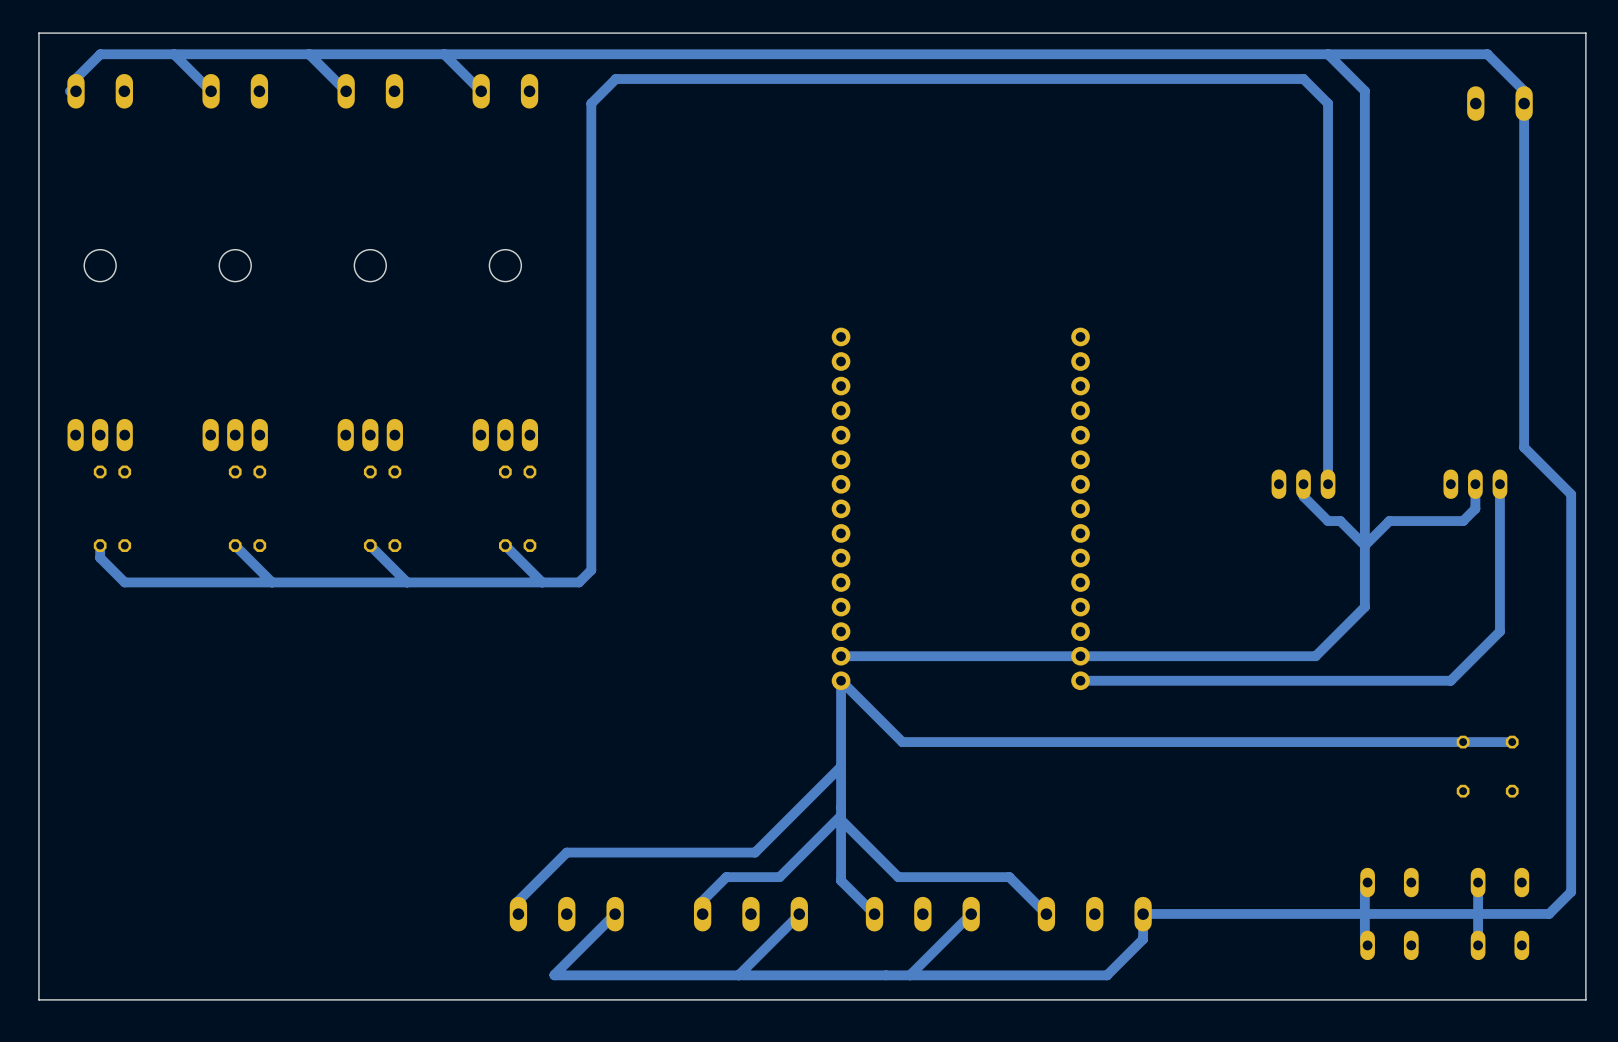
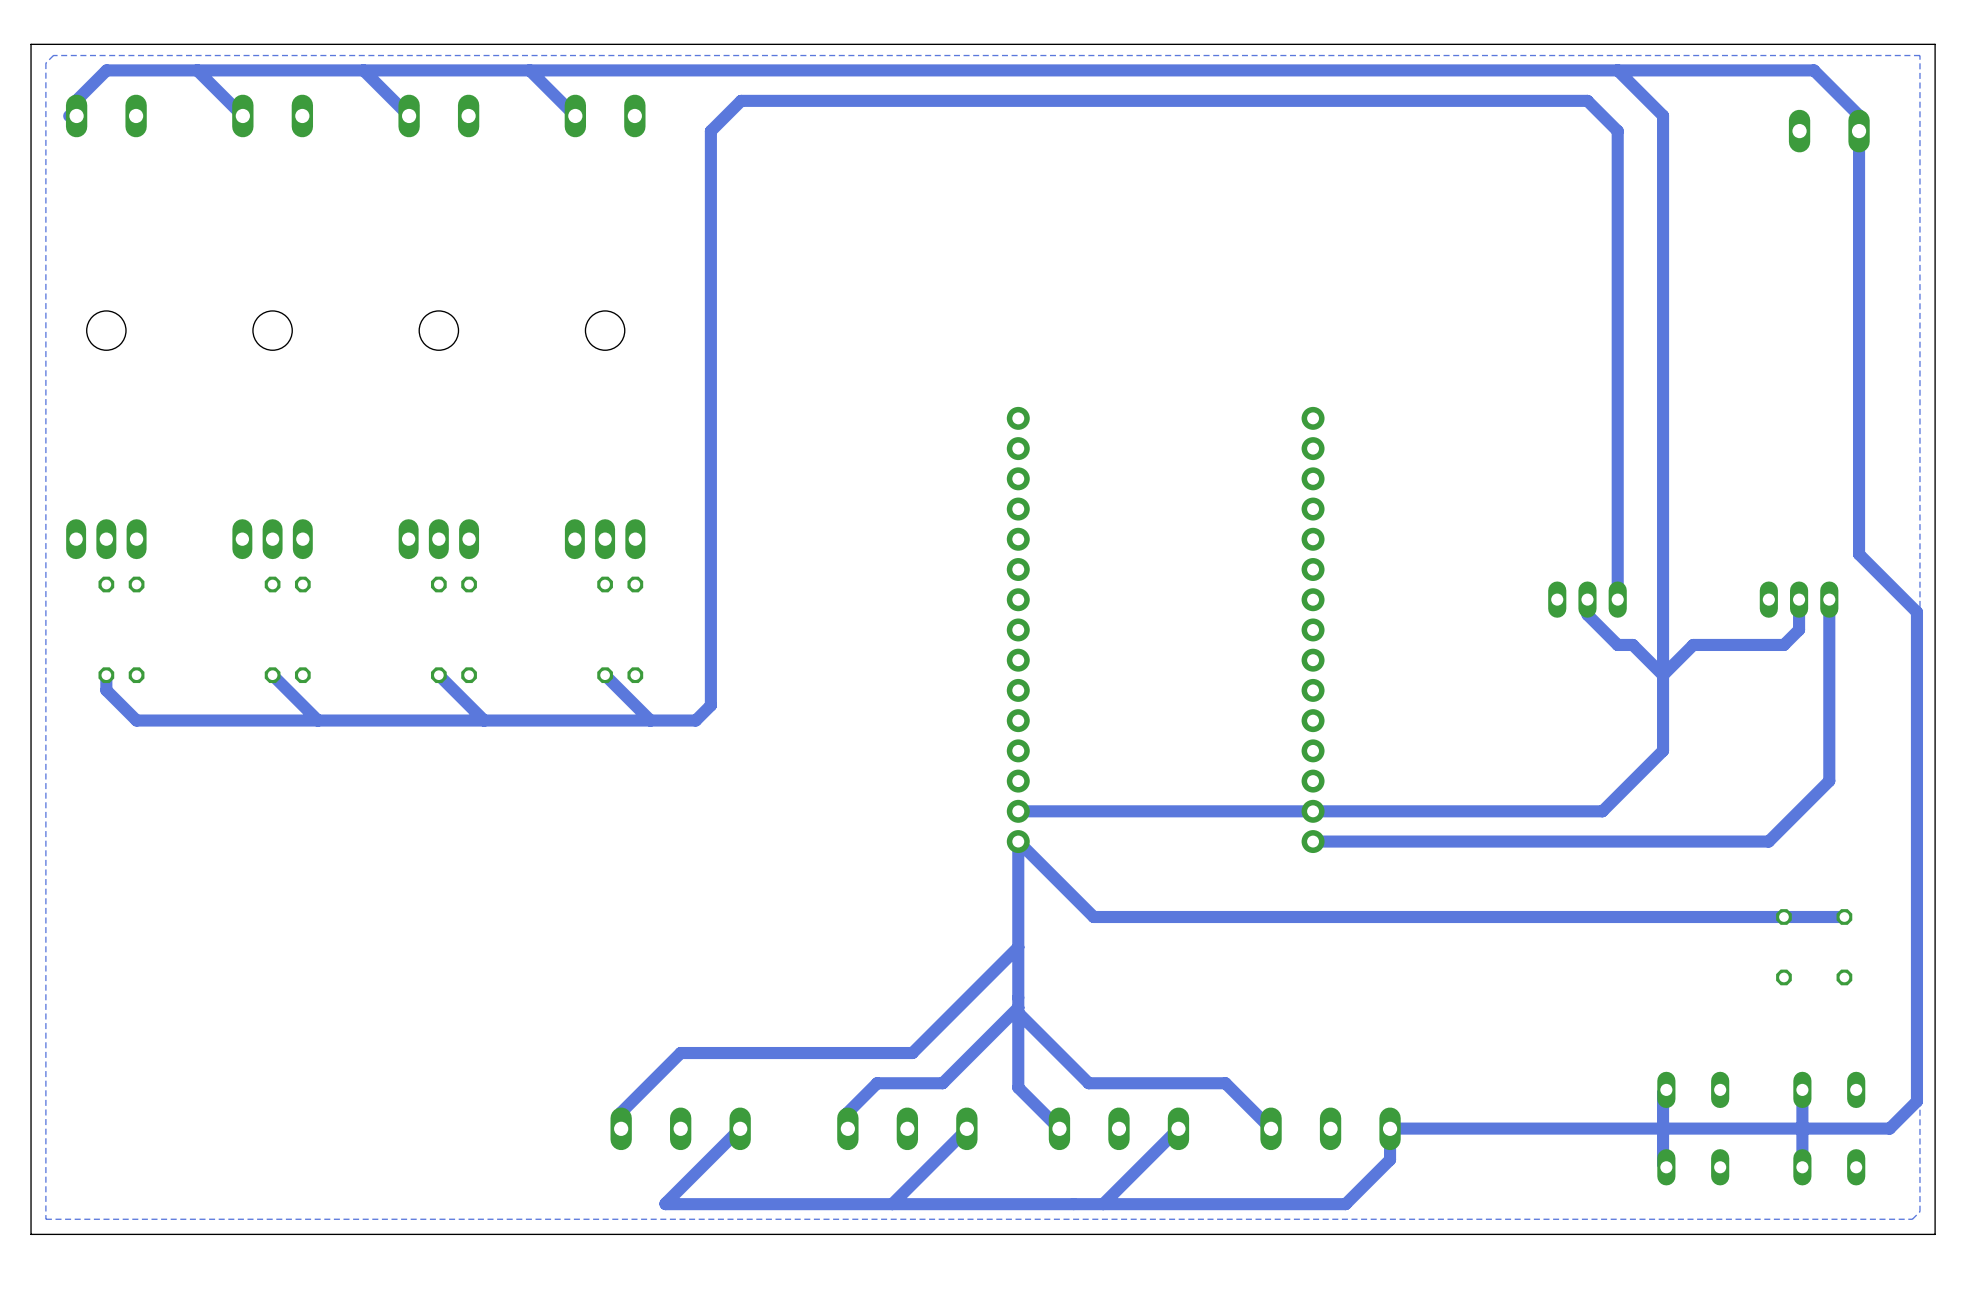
zone outline: none -> (1919, 55) (53, 55) (45, 63) (45, 1219) (1912, 1219) (1919, 1211) (1919, 55)

